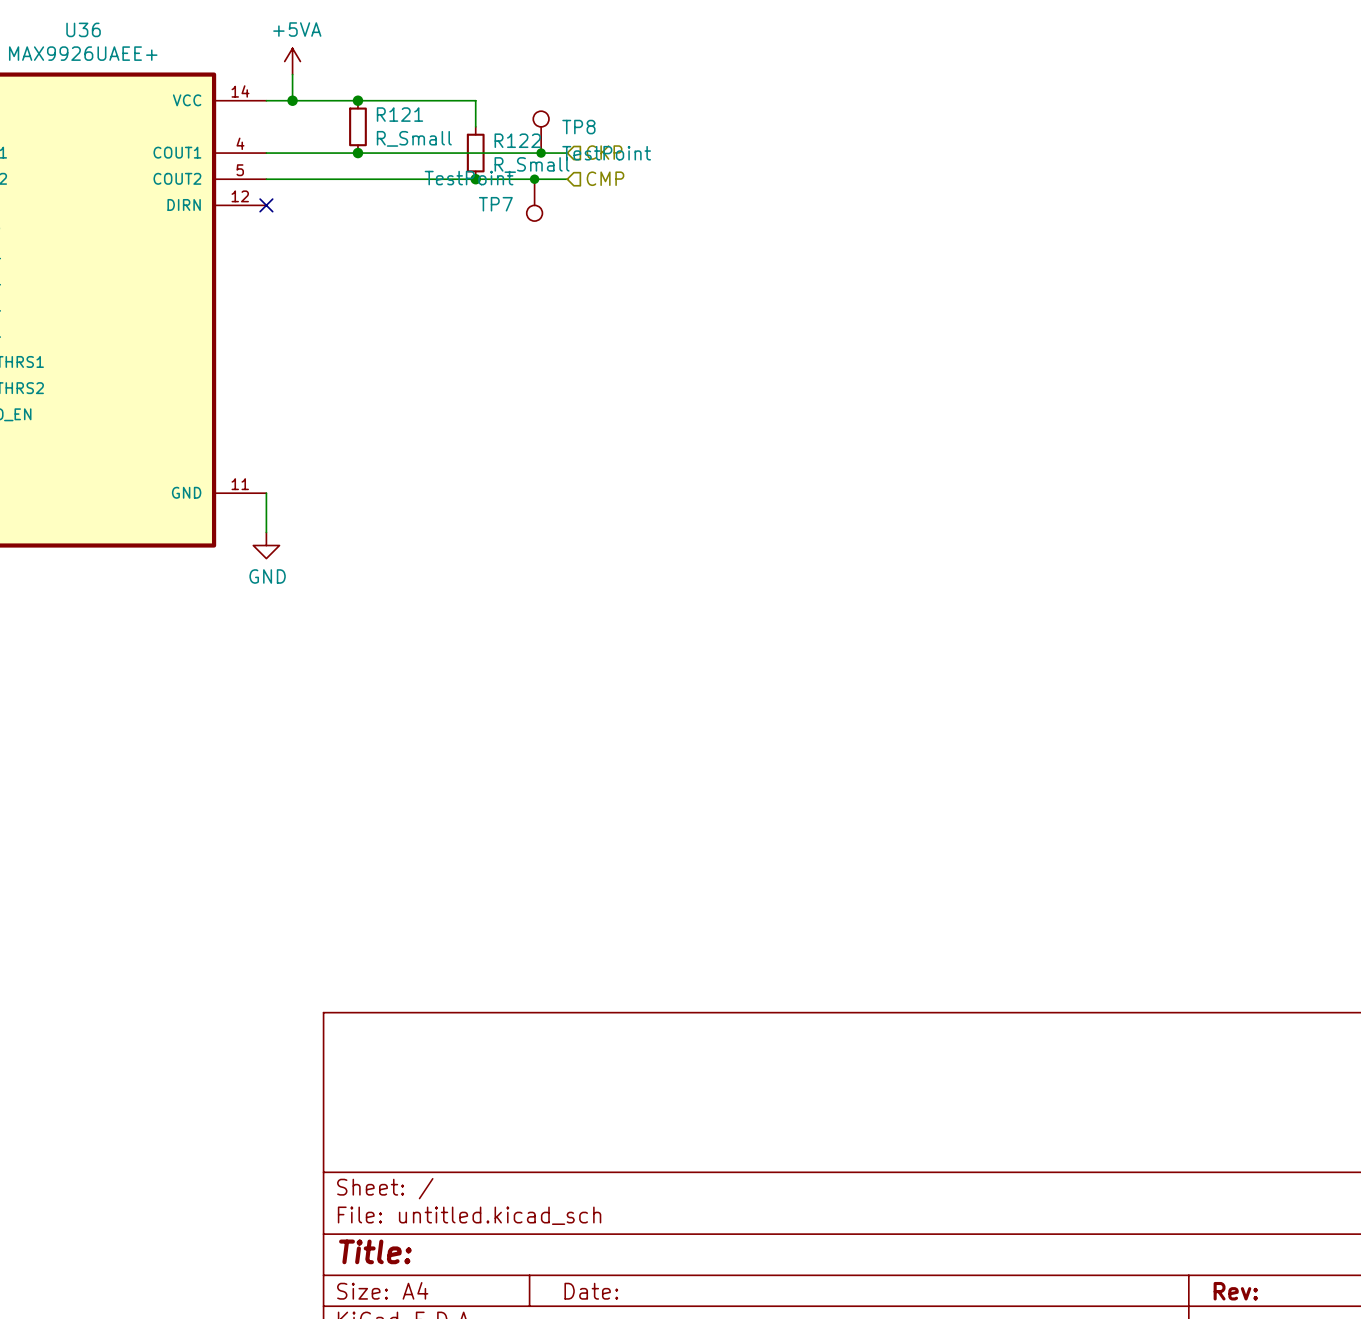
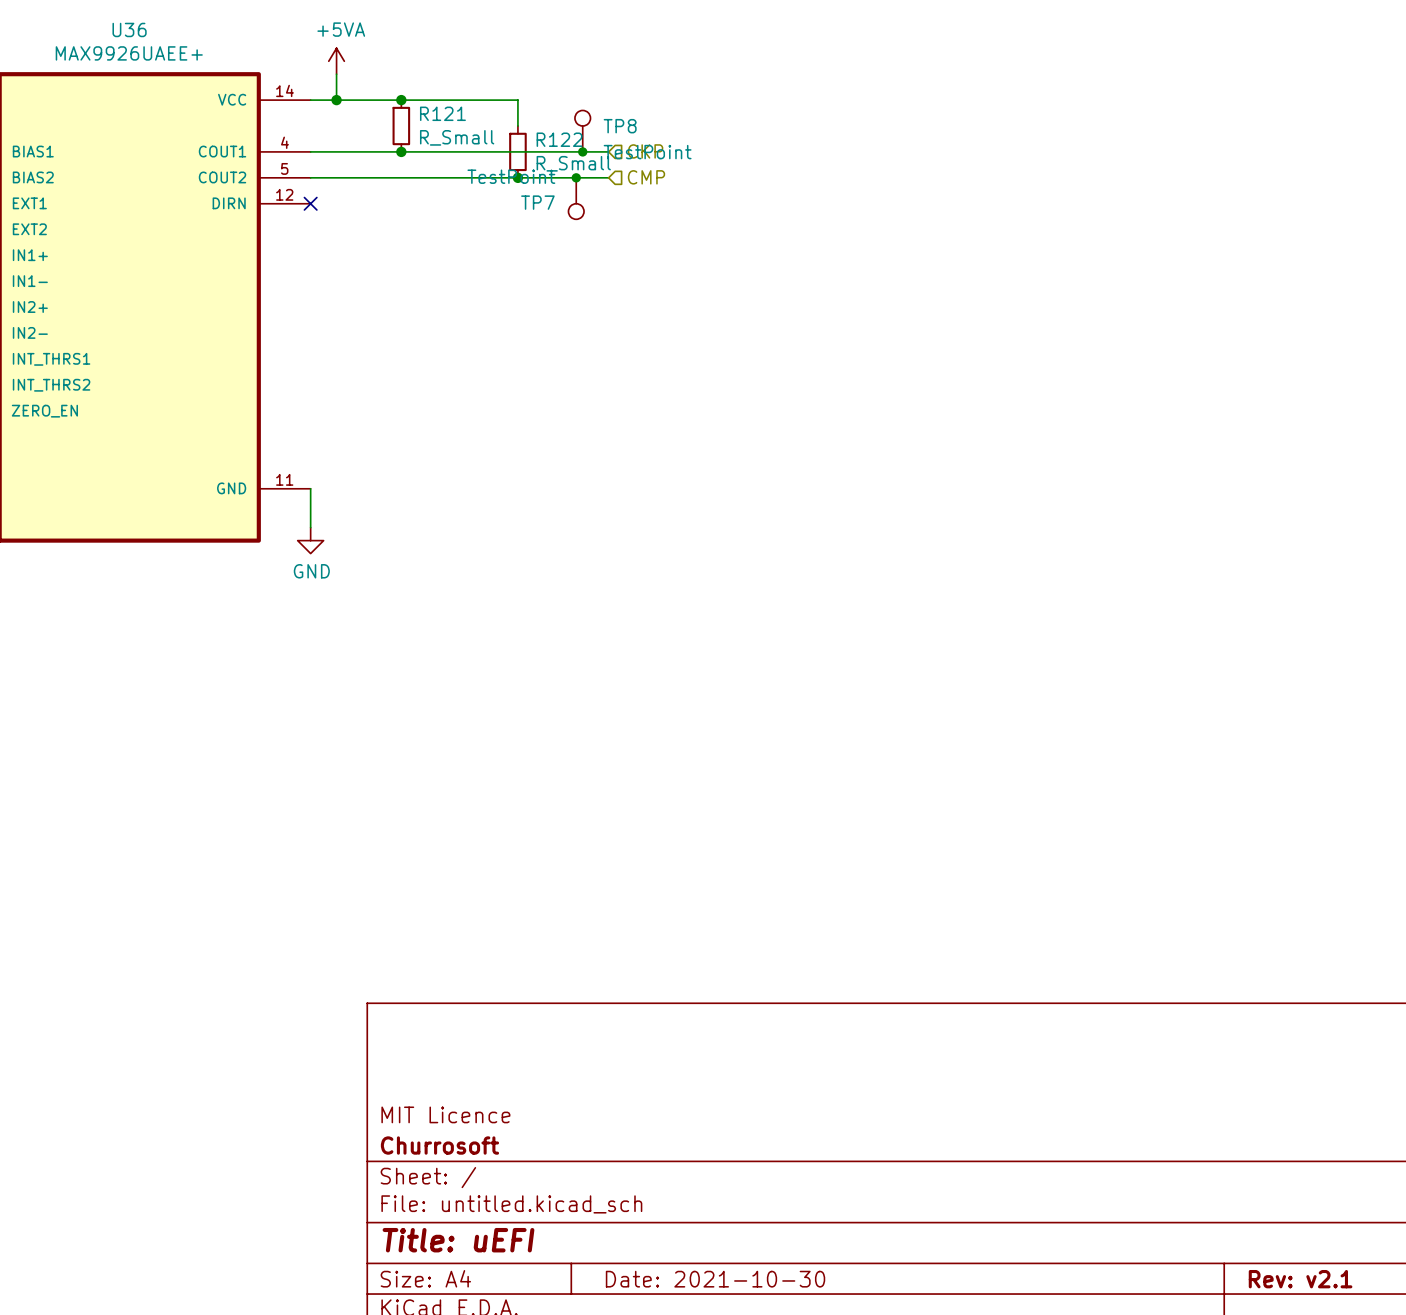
title block: none -> MIT Licence (445, 1114)
title block: none -> Churrosoft (439, 1145)
title block: Title: (375, 1251) -> Title: uEFI (458, 1240)
title block: Date: (591, 1291) -> Date: 2021-10-30 (715, 1279)
title block: Rev: (1235, 1291) -> Rev: v2.1 (1300, 1279)

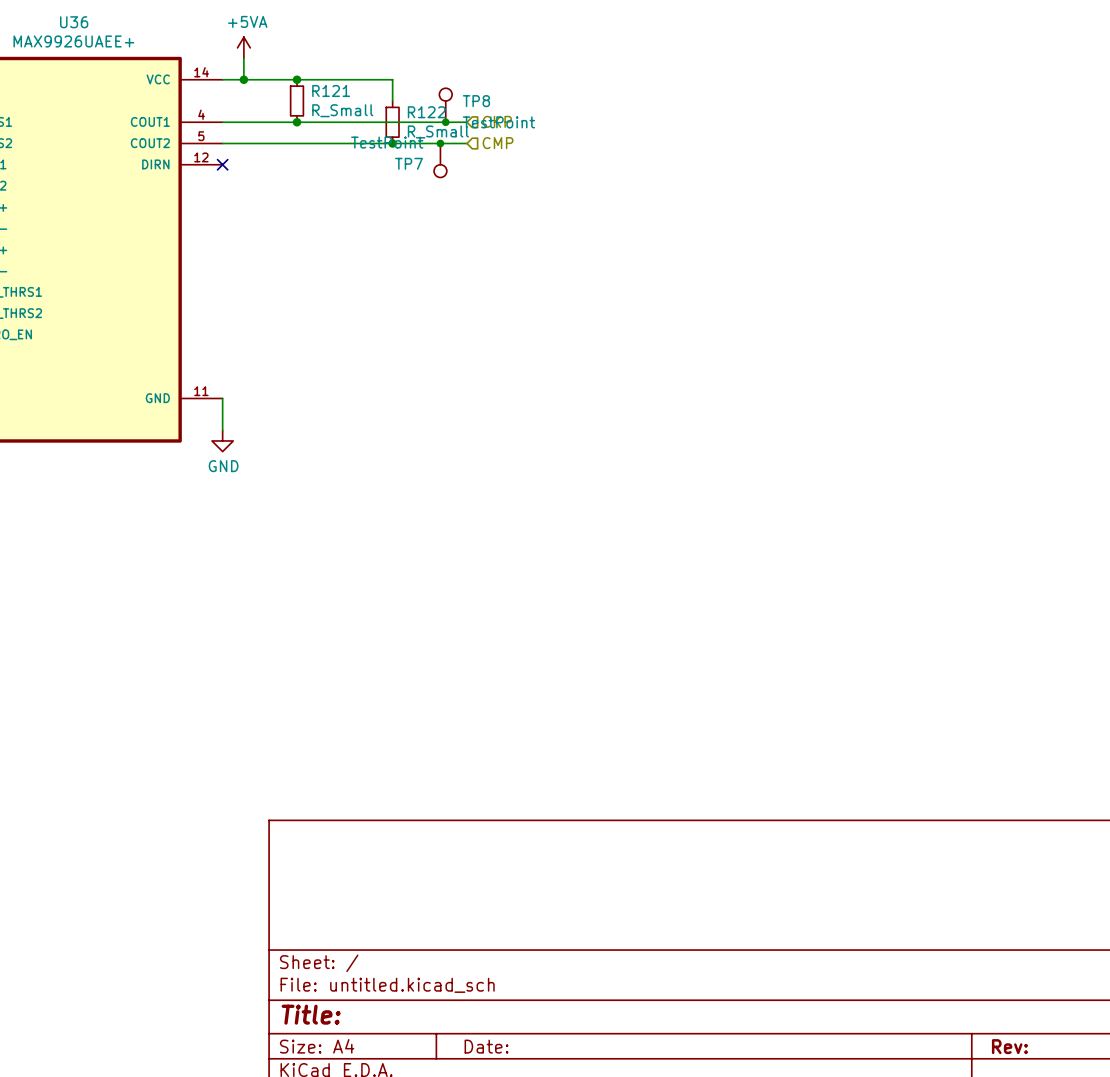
title block: MIT Licence (445, 1114) -> none
title block: Churrosoft (439, 1145) -> none
title block: Title: uEFI (458, 1240) -> Title: (311, 1014)
title block: Date: 2021-10-30 (715, 1279) -> Date: (486, 1046)
title block: Rev: v2.1 (1300, 1279) -> Rev: (1009, 1046)

